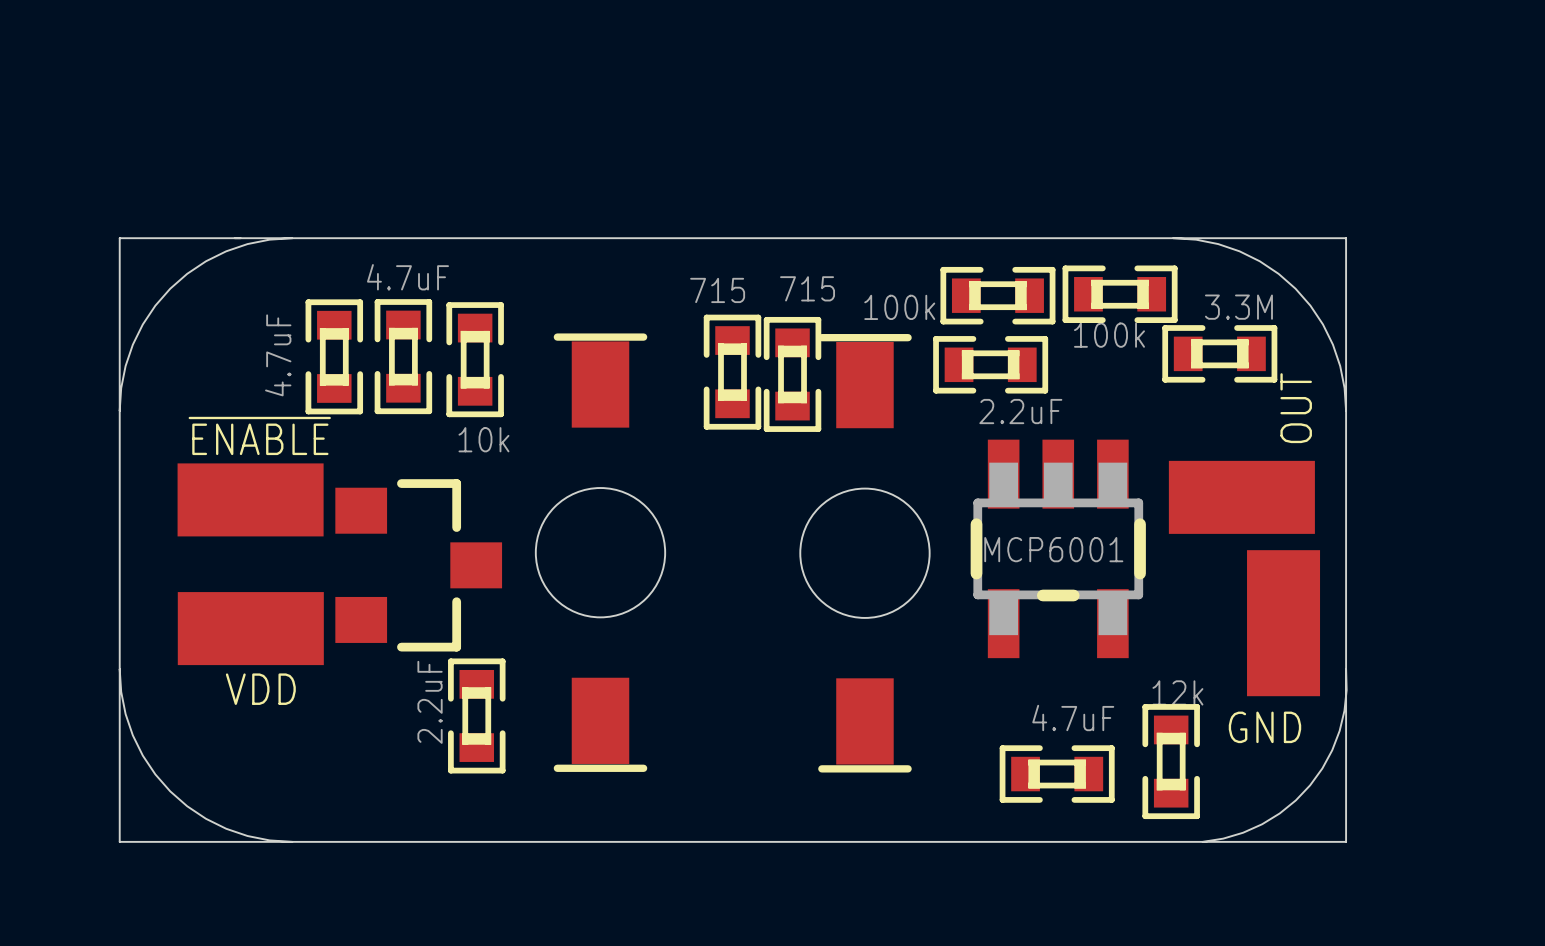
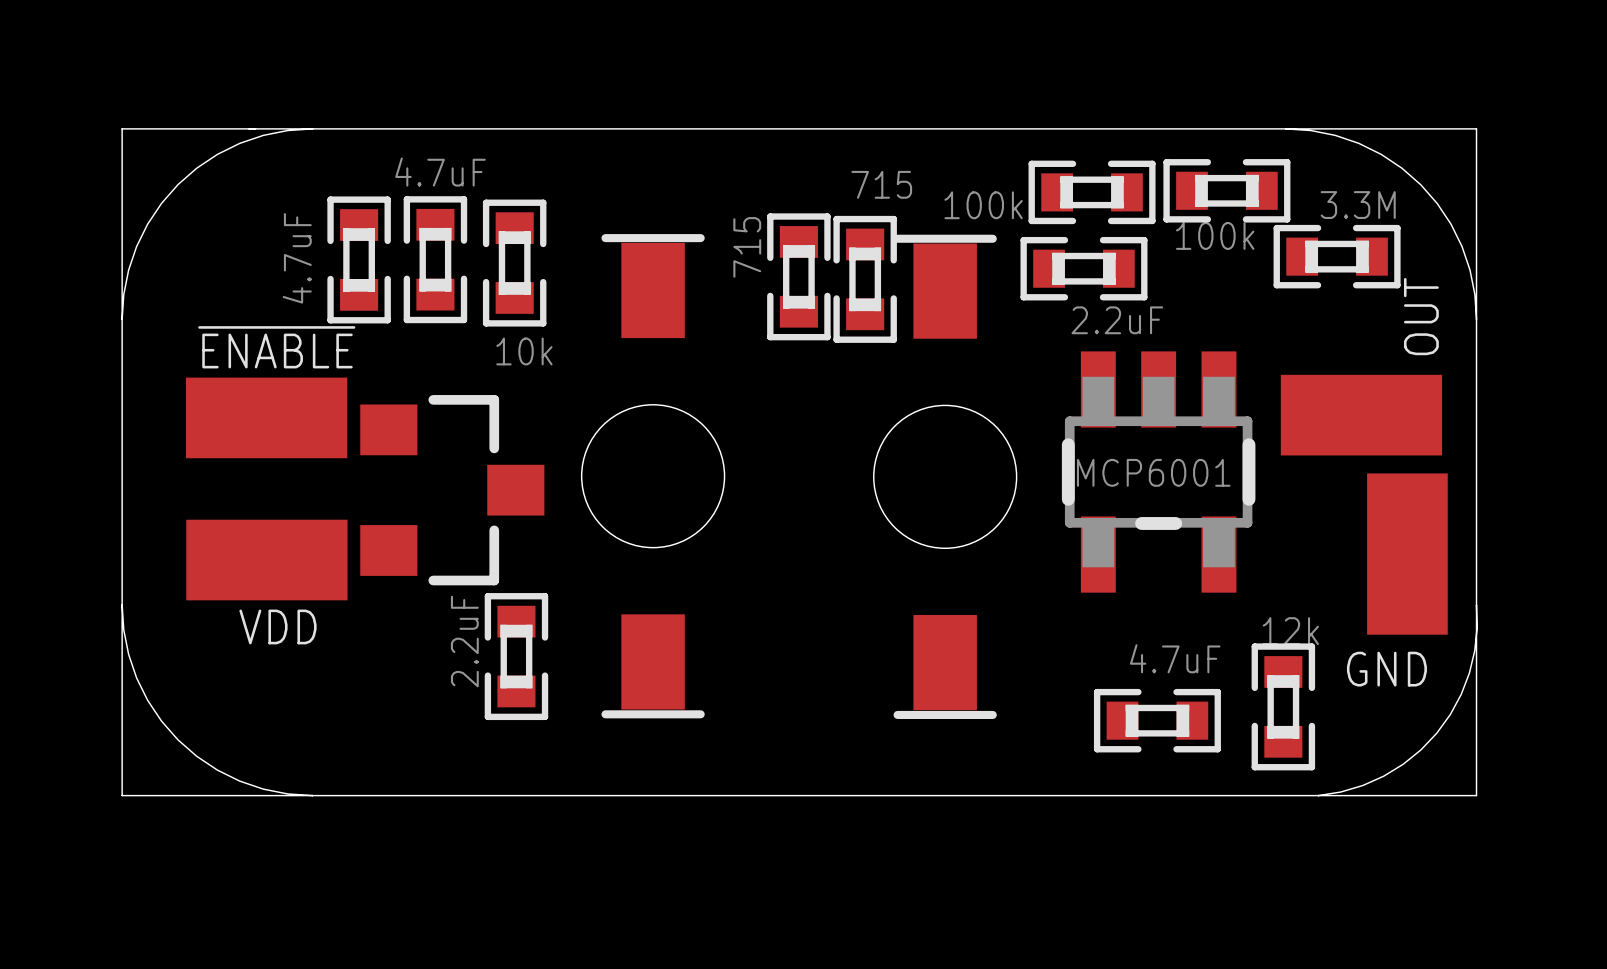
part value rotation: 0° (717, 290) -> 90° counterclockwise (747, 247)

